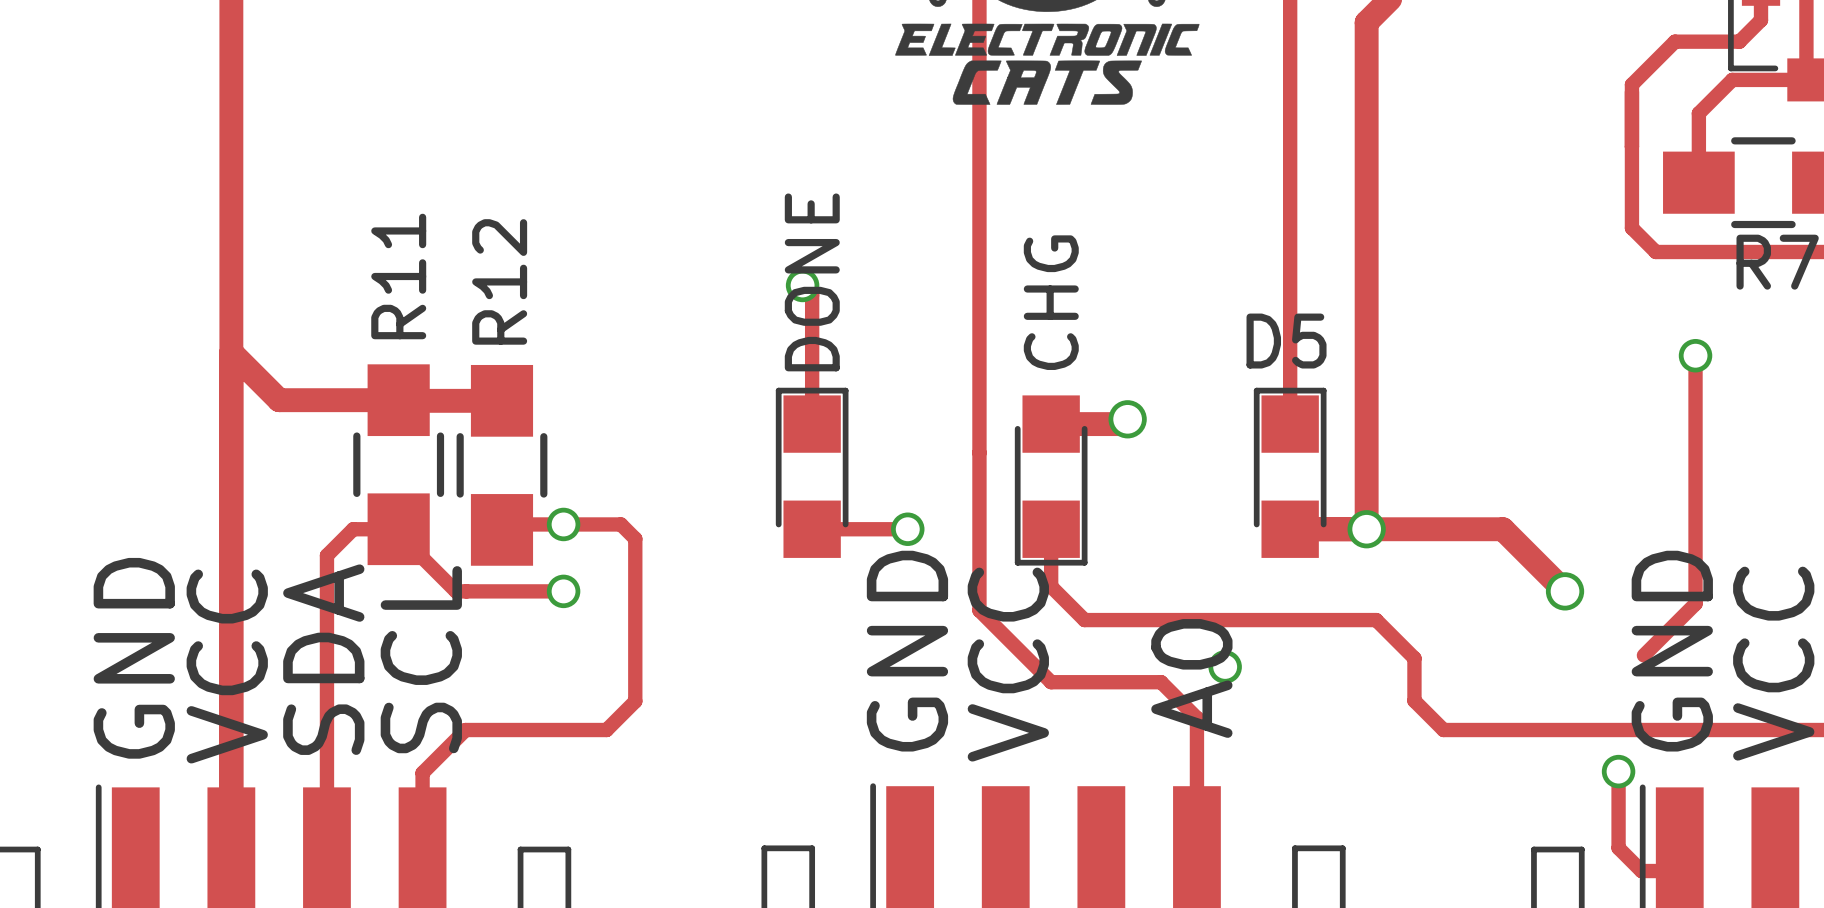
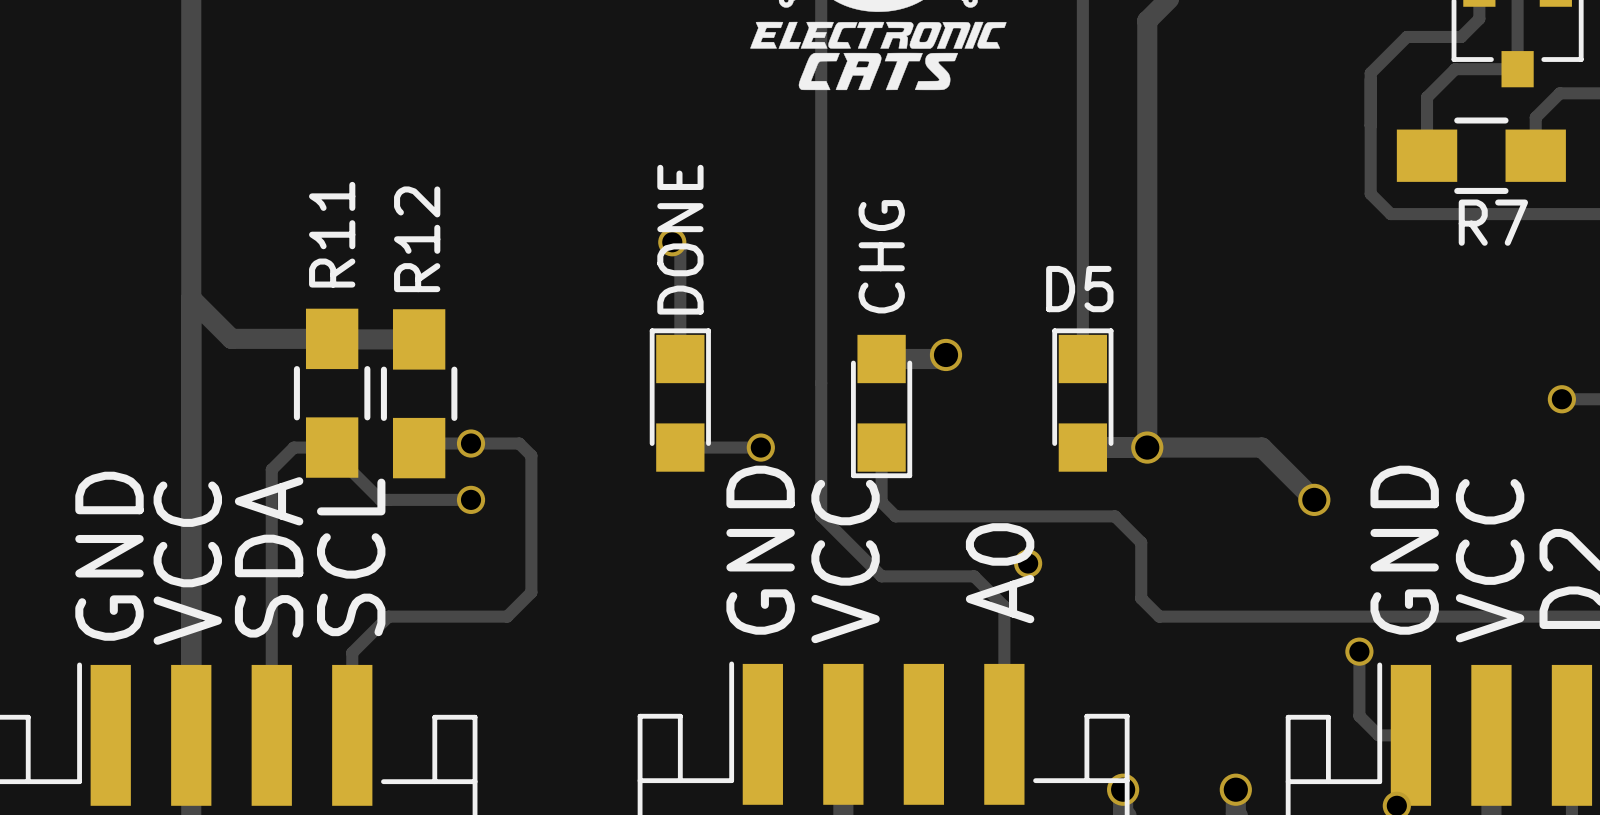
track: (1695, 355) (1695, 603) (1643, 655) -> none
via: (1695, 355) -> none
track: (1051, 586) (1084, 620) (1376, 620) (1414, 658) (1414, 700) (1443, 730) -> (881, 495) (881, 502) (895, 516) (1115, 516) (1141, 542) (1141, 598) (1159, 616) (1212, 616)

